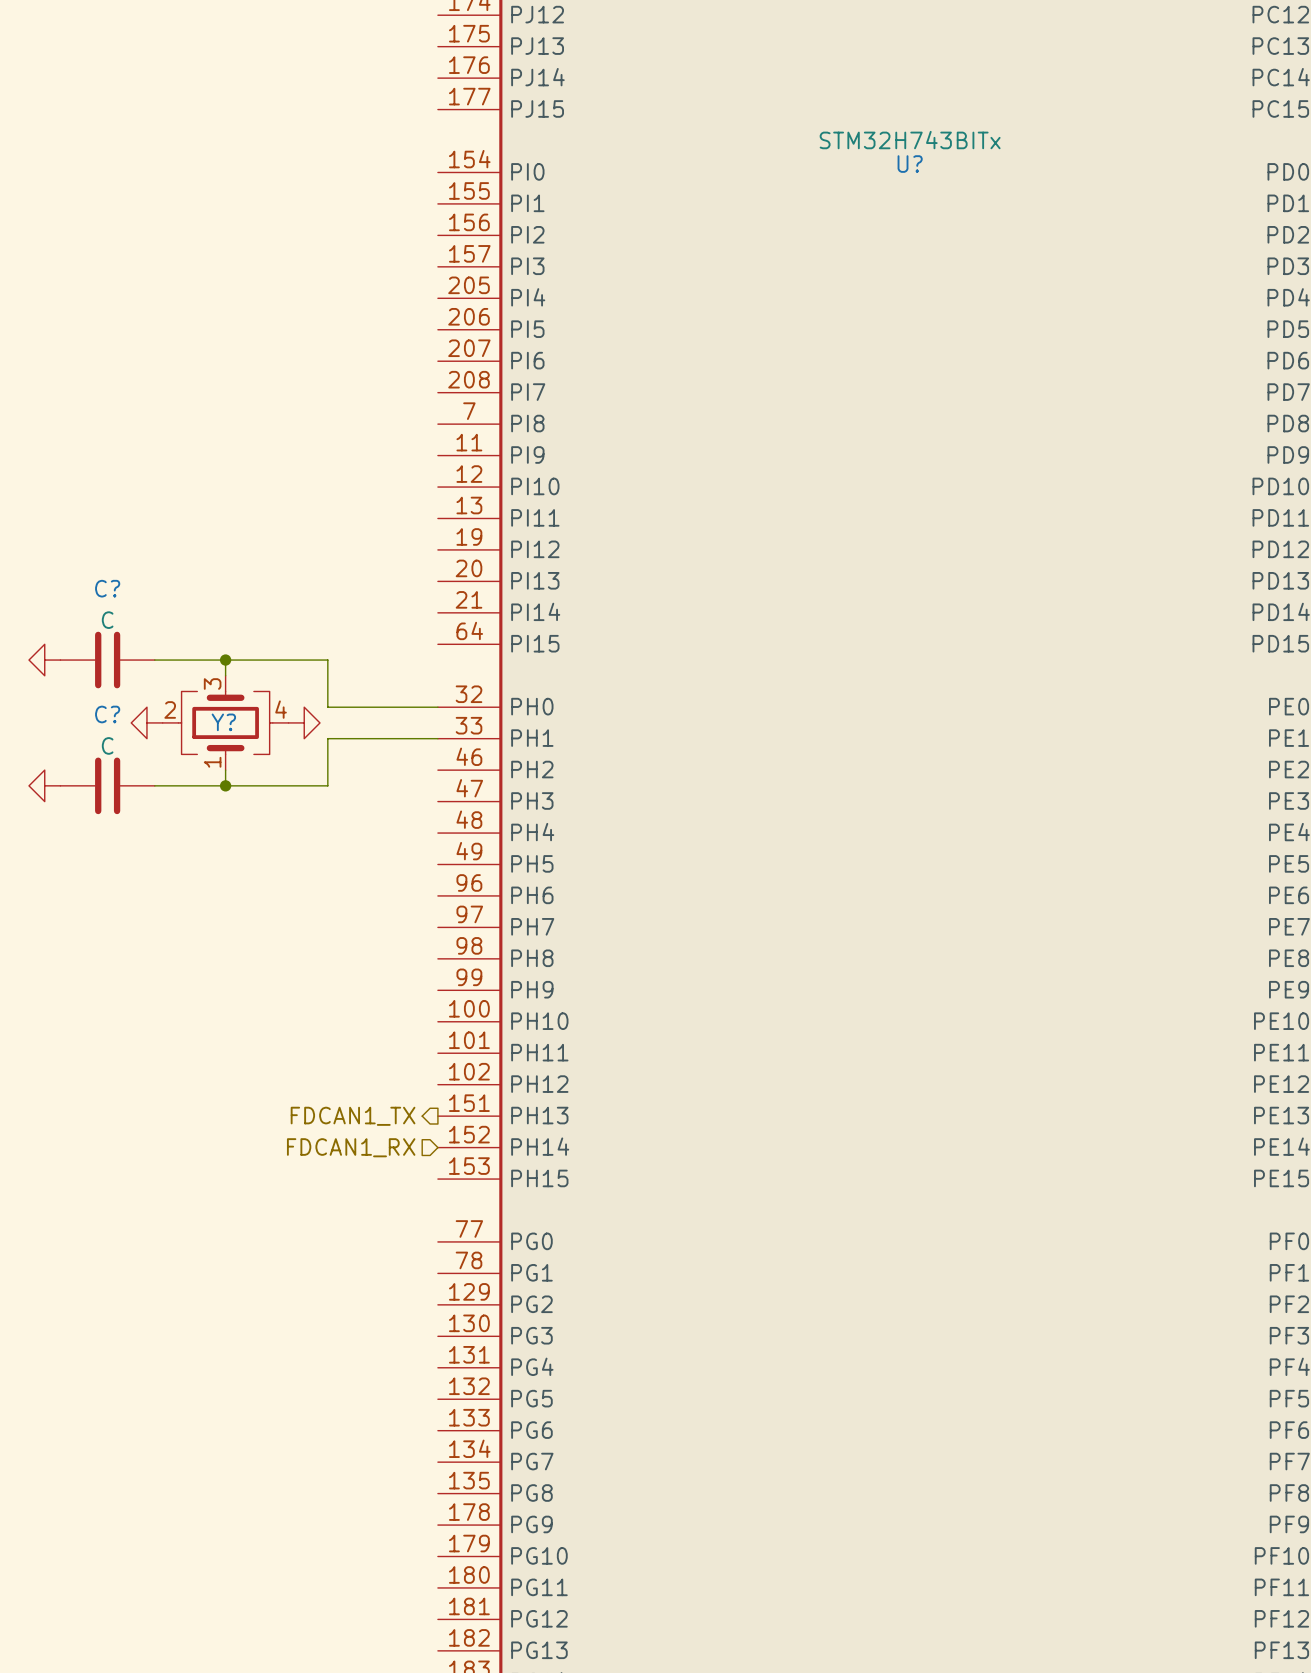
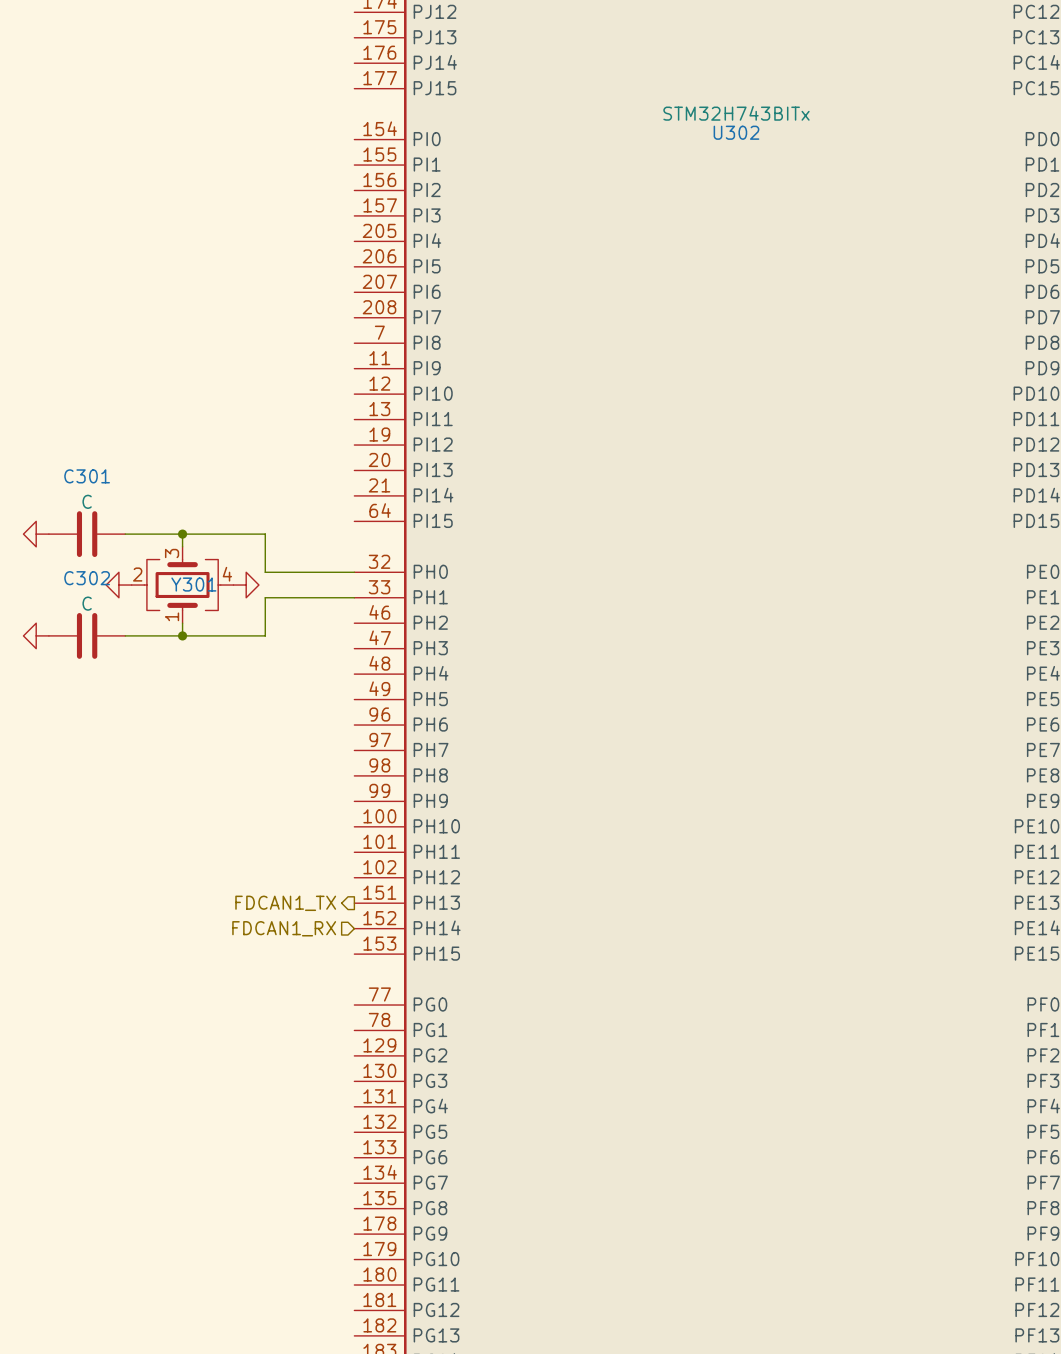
U? name: U? (910, 164) -> U302 (736, 132)
C? name: C? (107, 588) -> C301 (87, 476)
C? name: C? (107, 714) -> C302 (87, 578)
Y? name: Y? (223, 722) -> Y301 (193, 584)

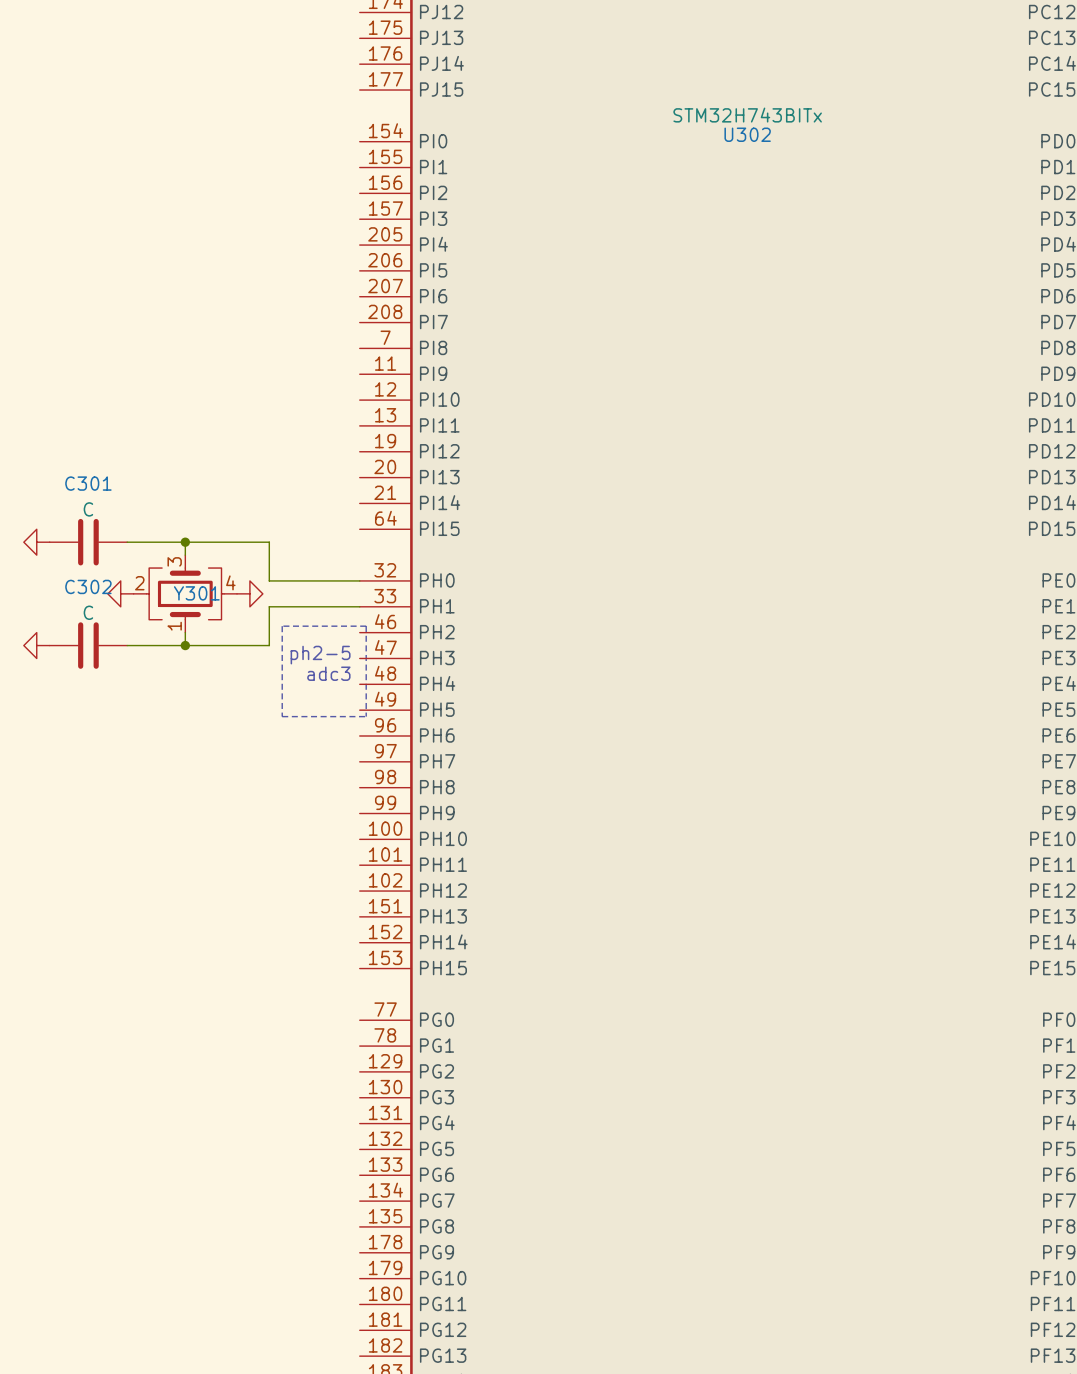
line: none -> (282, 626) (282, 716) (366, 716) (366, 626) (282, 626)
text: none -> ph2-5 (320, 655)
text: none -> adc3 (328, 673)
hierarchical label: FDCAN1_TX (285, 903) -> none
hierarchical label: FDCAN1_RX (284, 928) -> none

